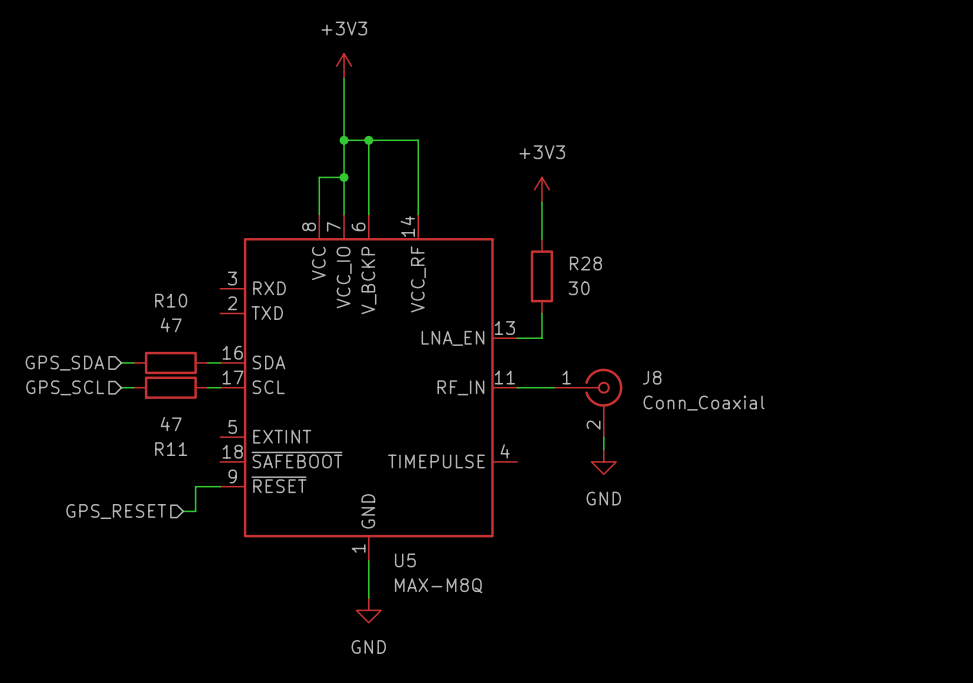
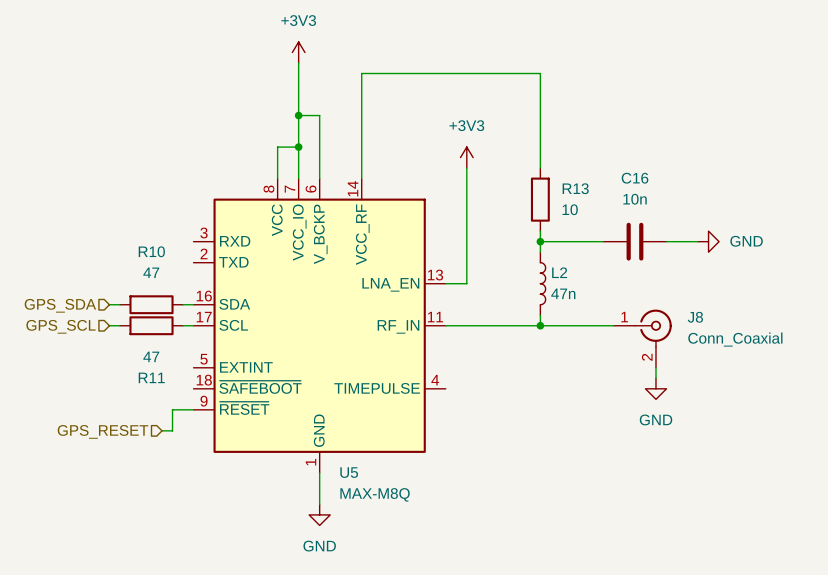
wire: (368, 140) (418, 140) -> (540, 168) (540, 73) (361, 73) (361, 115)
junction: (368, 140) -> none
wire: none -> (466, 199) (466, 262)
R13: none -> 10 (540, 199)
R28: 30 (541, 276) -> none
wire: none -> (540, 231) (540, 252)
wire: none -> (540, 241) (603, 241)
junction: none -> (540, 241)
C16: none -> 10n (634, 241)
wire: none -> (666, 241) (698, 241)
power symbol: none -> GND (708, 241)
L2: none -> 47n (542, 283)
wire: none -> (477, 325) (613, 325)
junction: none -> (540, 325)
J8 position: (588, 402) -> (642, 338)
wire: (603, 437) (603, 449) -> (540, 315) (540, 325)
wire: none -> (655, 367) (655, 378)
power symbol: GND (603, 461) -> none
power symbol: none -> GND (655, 388)

